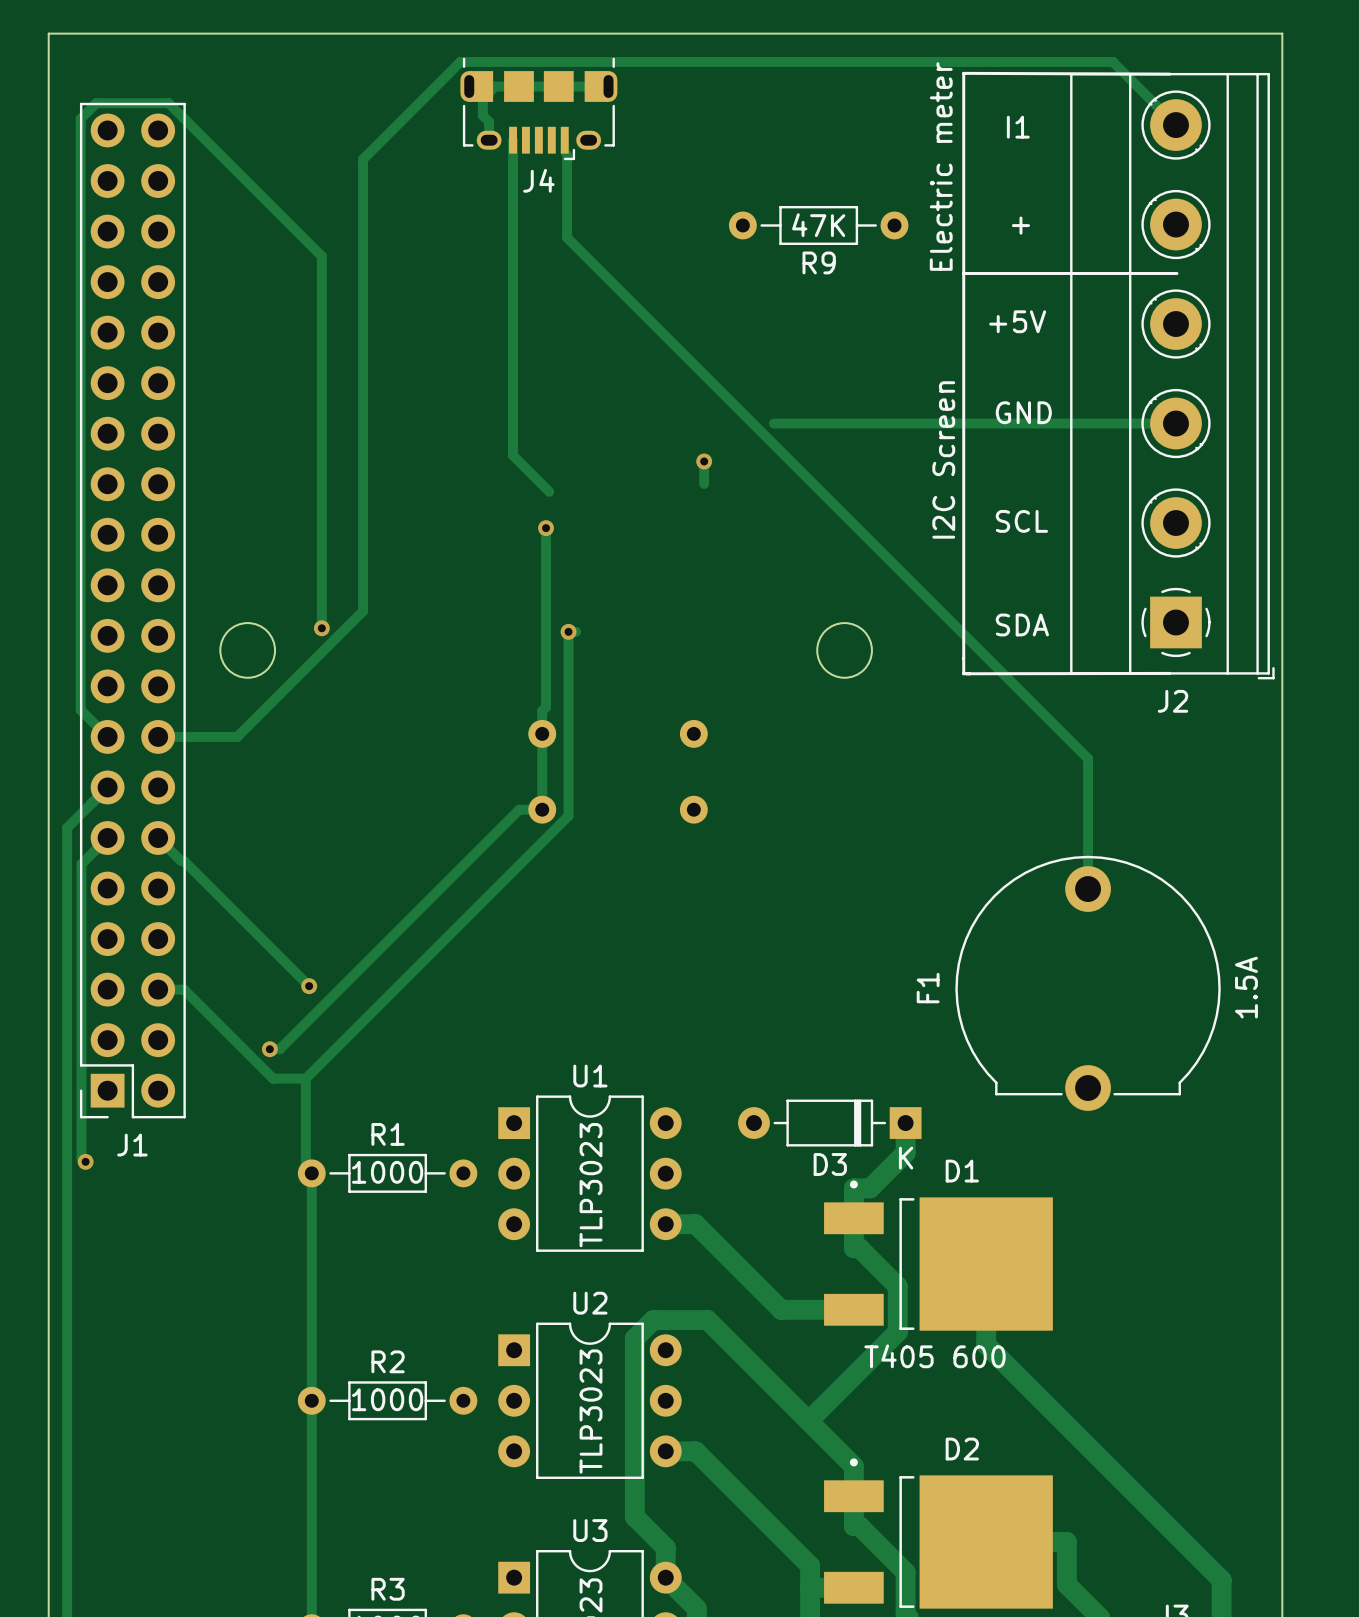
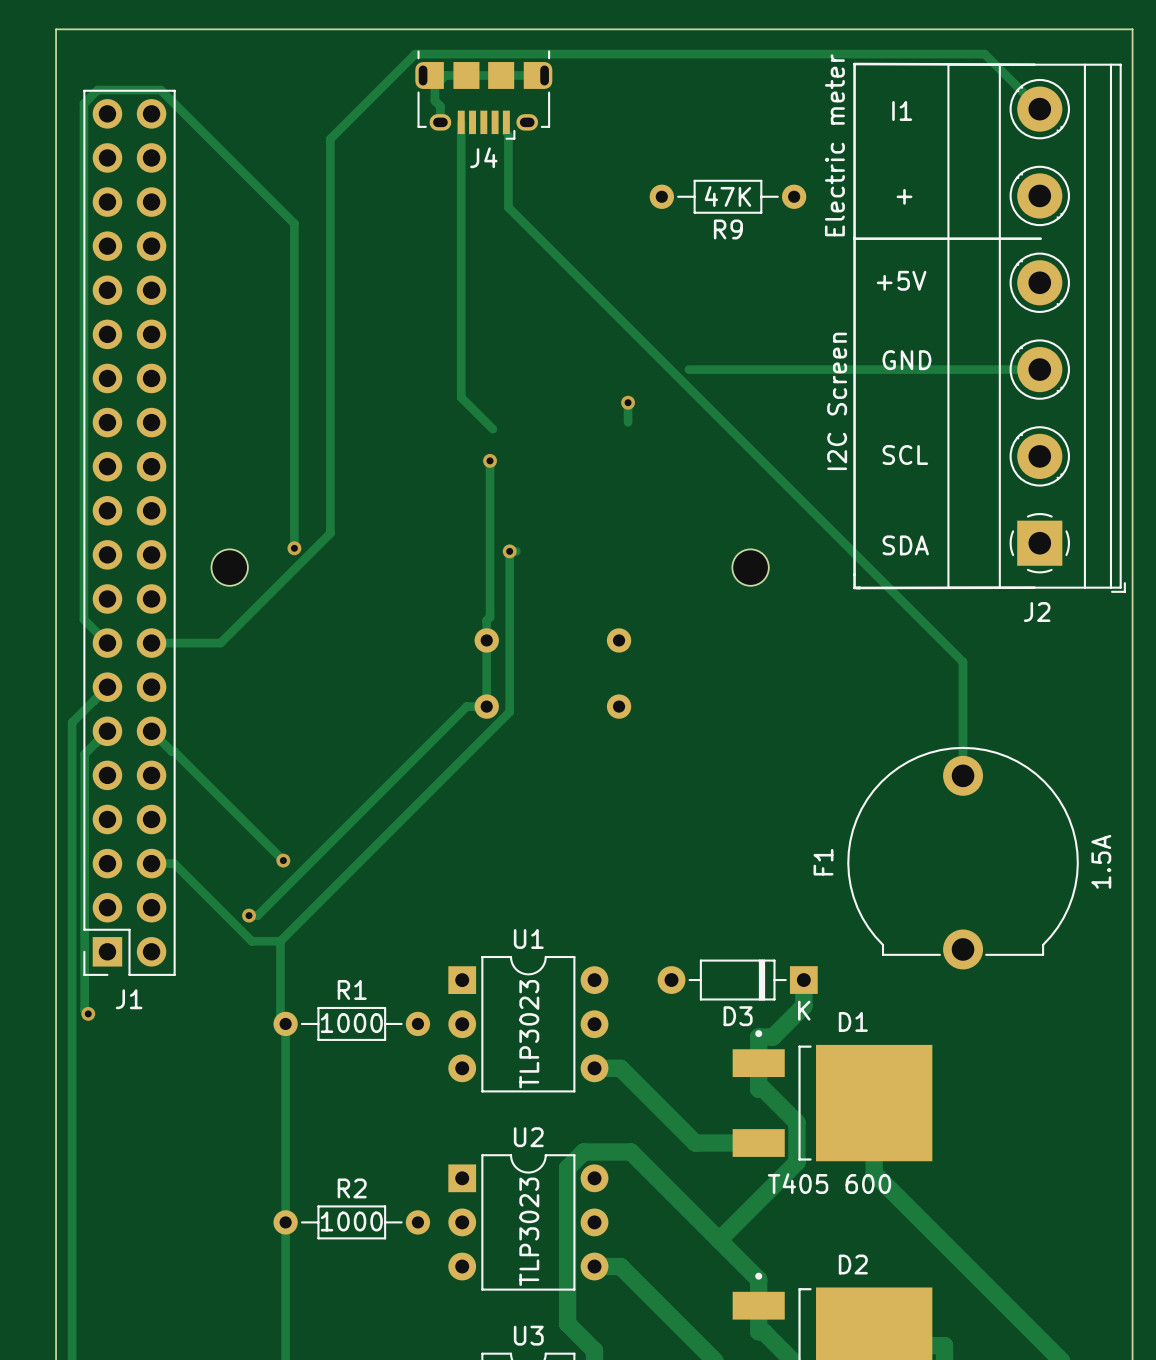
round board edge: [219, 622, 277, 679] -> none
round board edge: [816, 622, 873, 679] -> none
part: none -> (229, 567)
part: none -> (750, 567)

